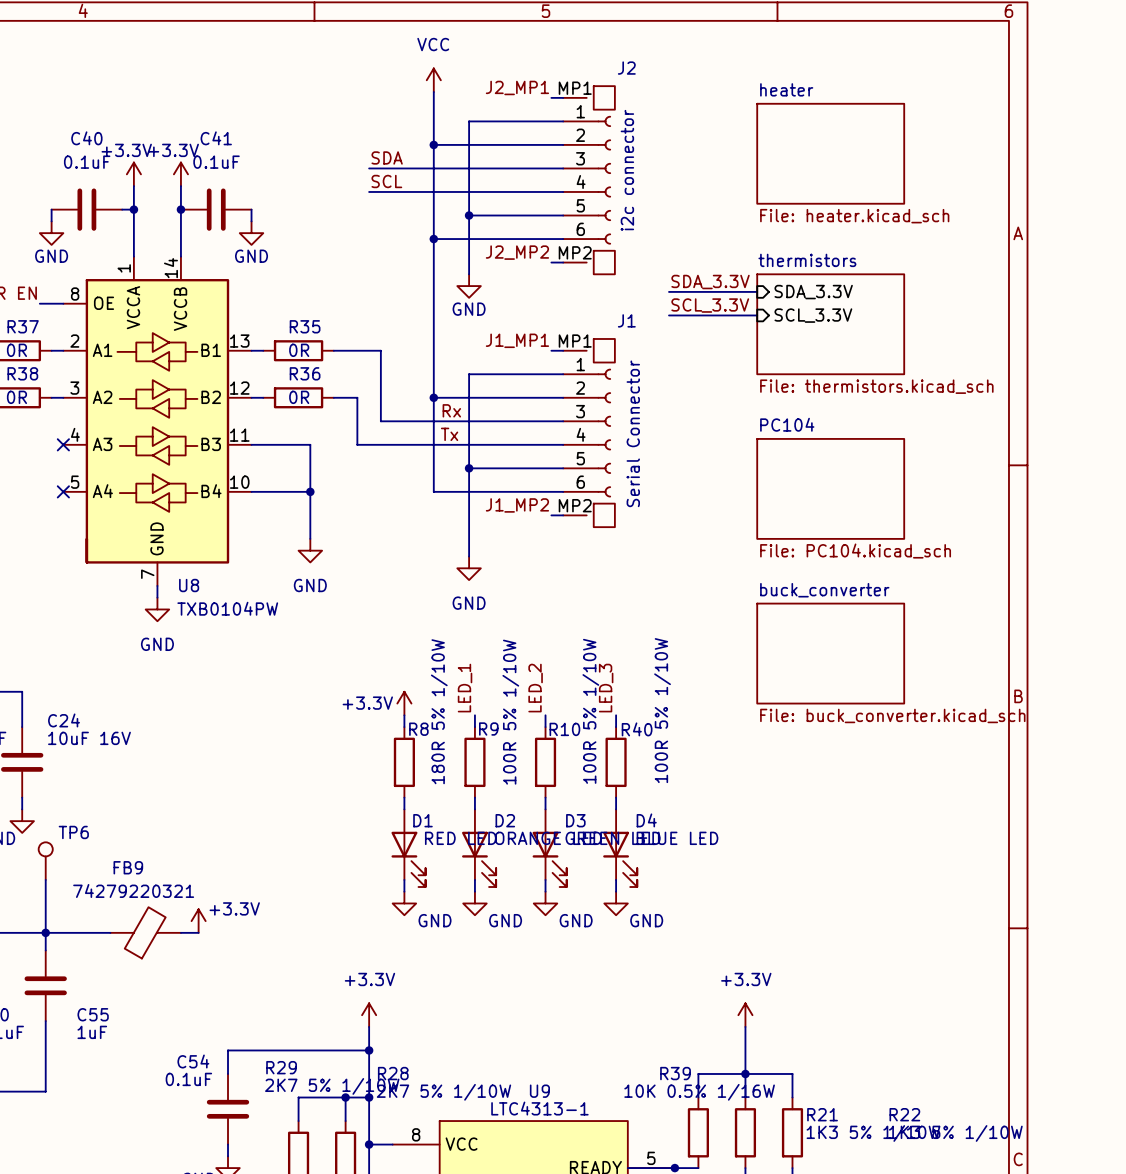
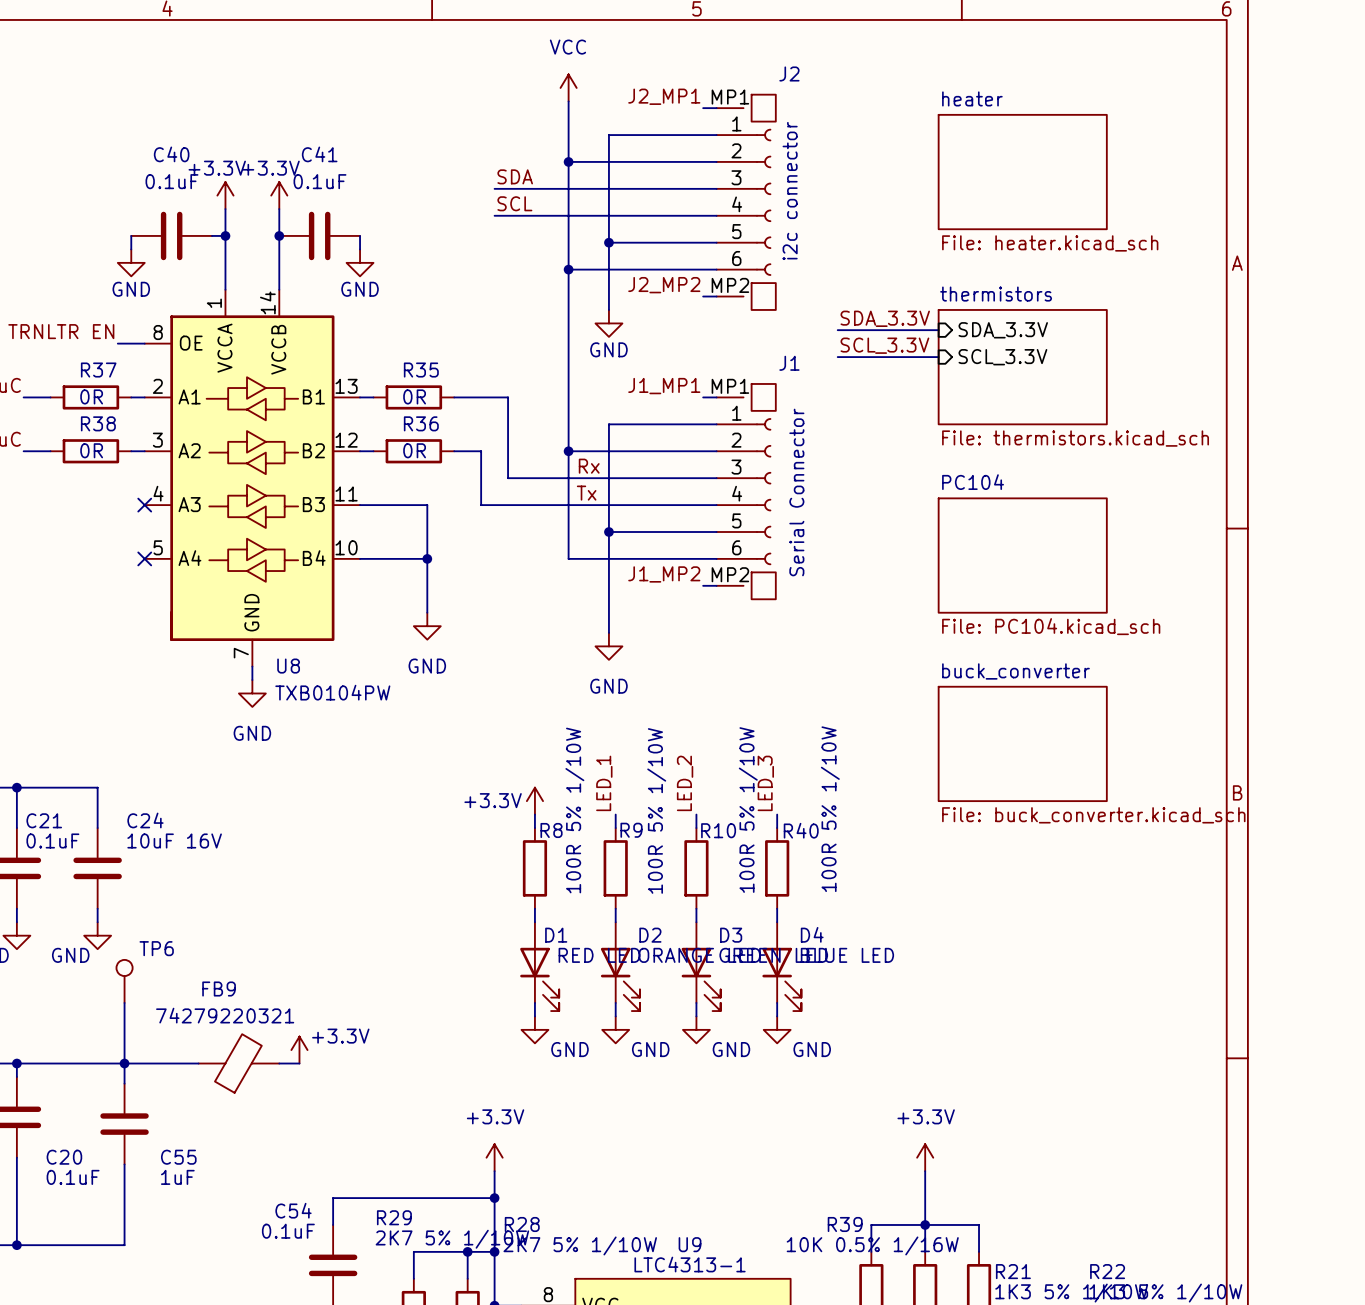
R8 value: 180R 5% 1/10W (439, 711) -> 100R 5% 1/10W (574, 810)

